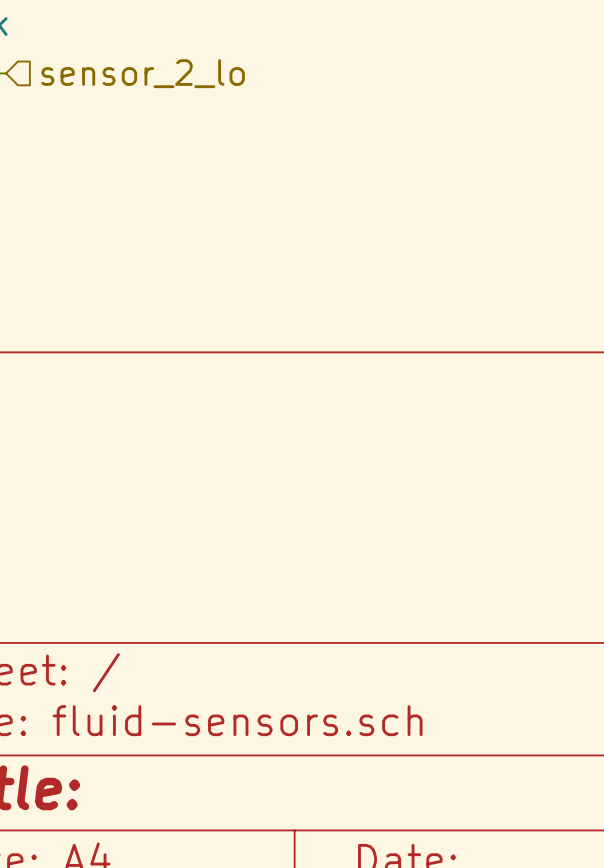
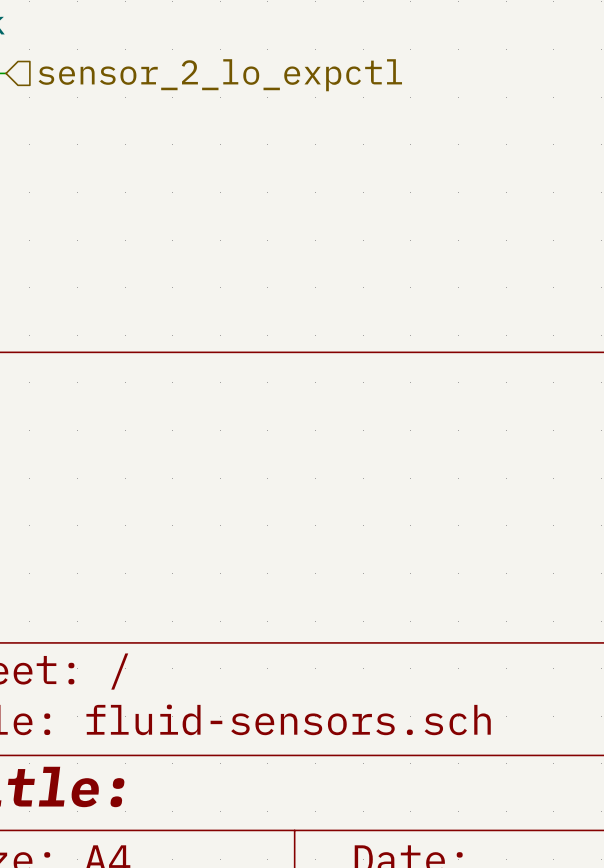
hierarchical label: sensor_2_lo (143, 73) -> sensor_2_lo_expctl (220, 75)

